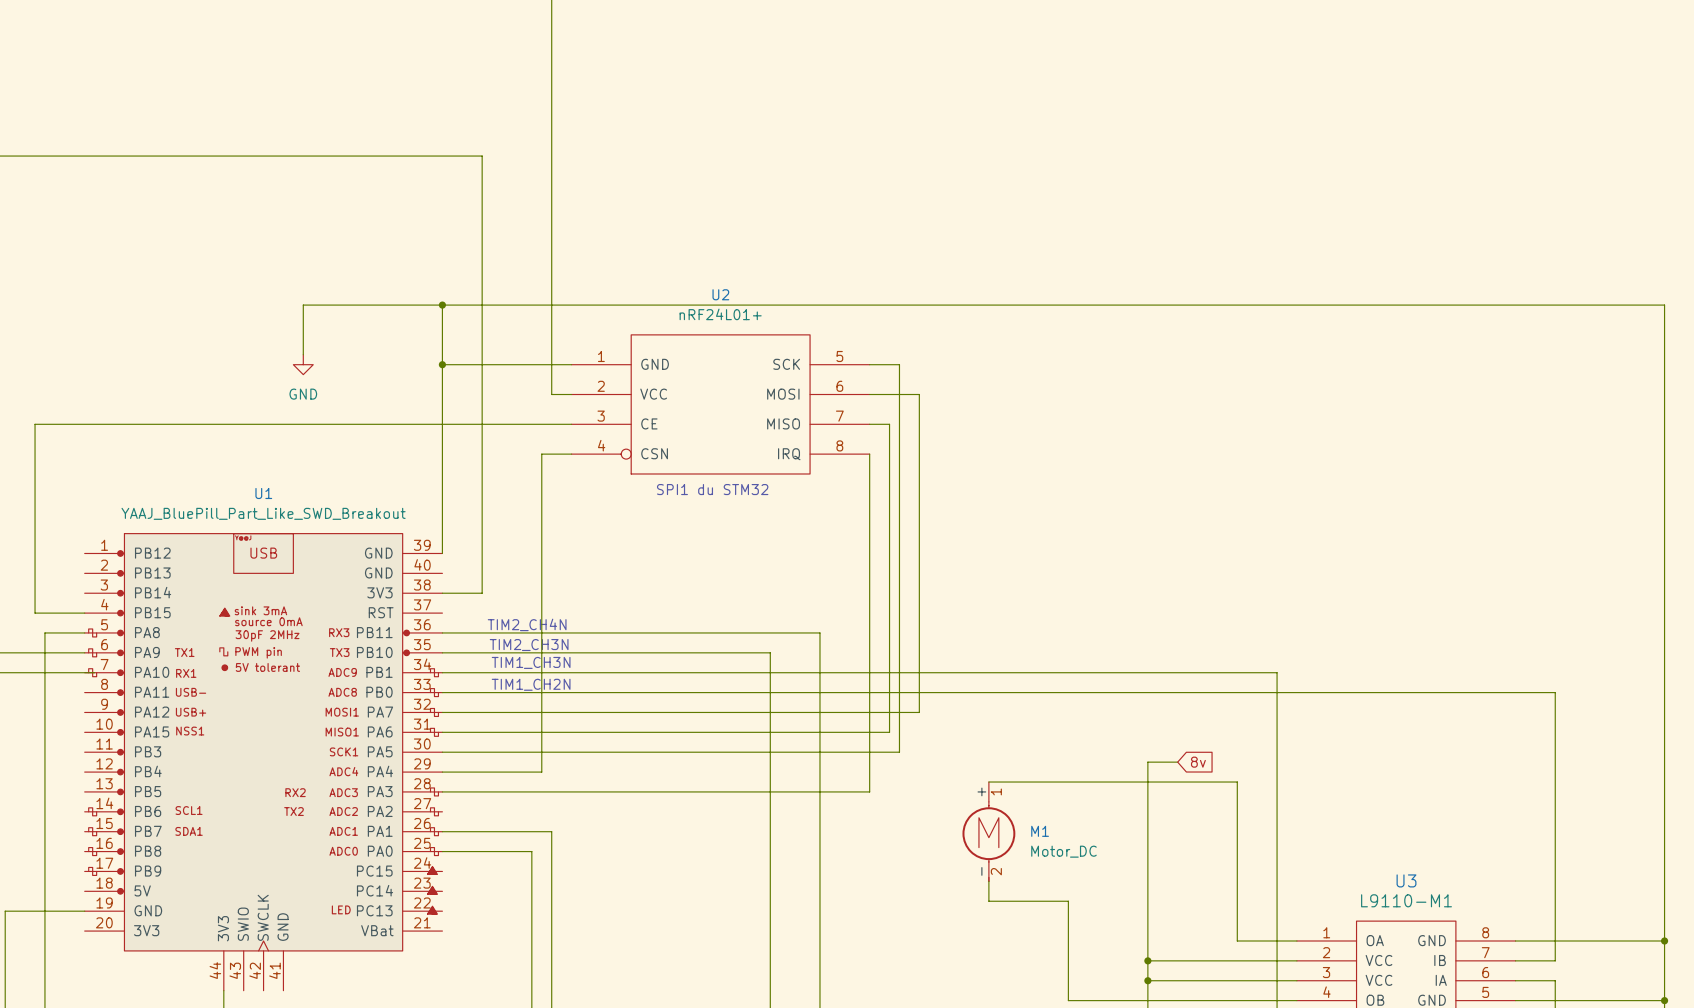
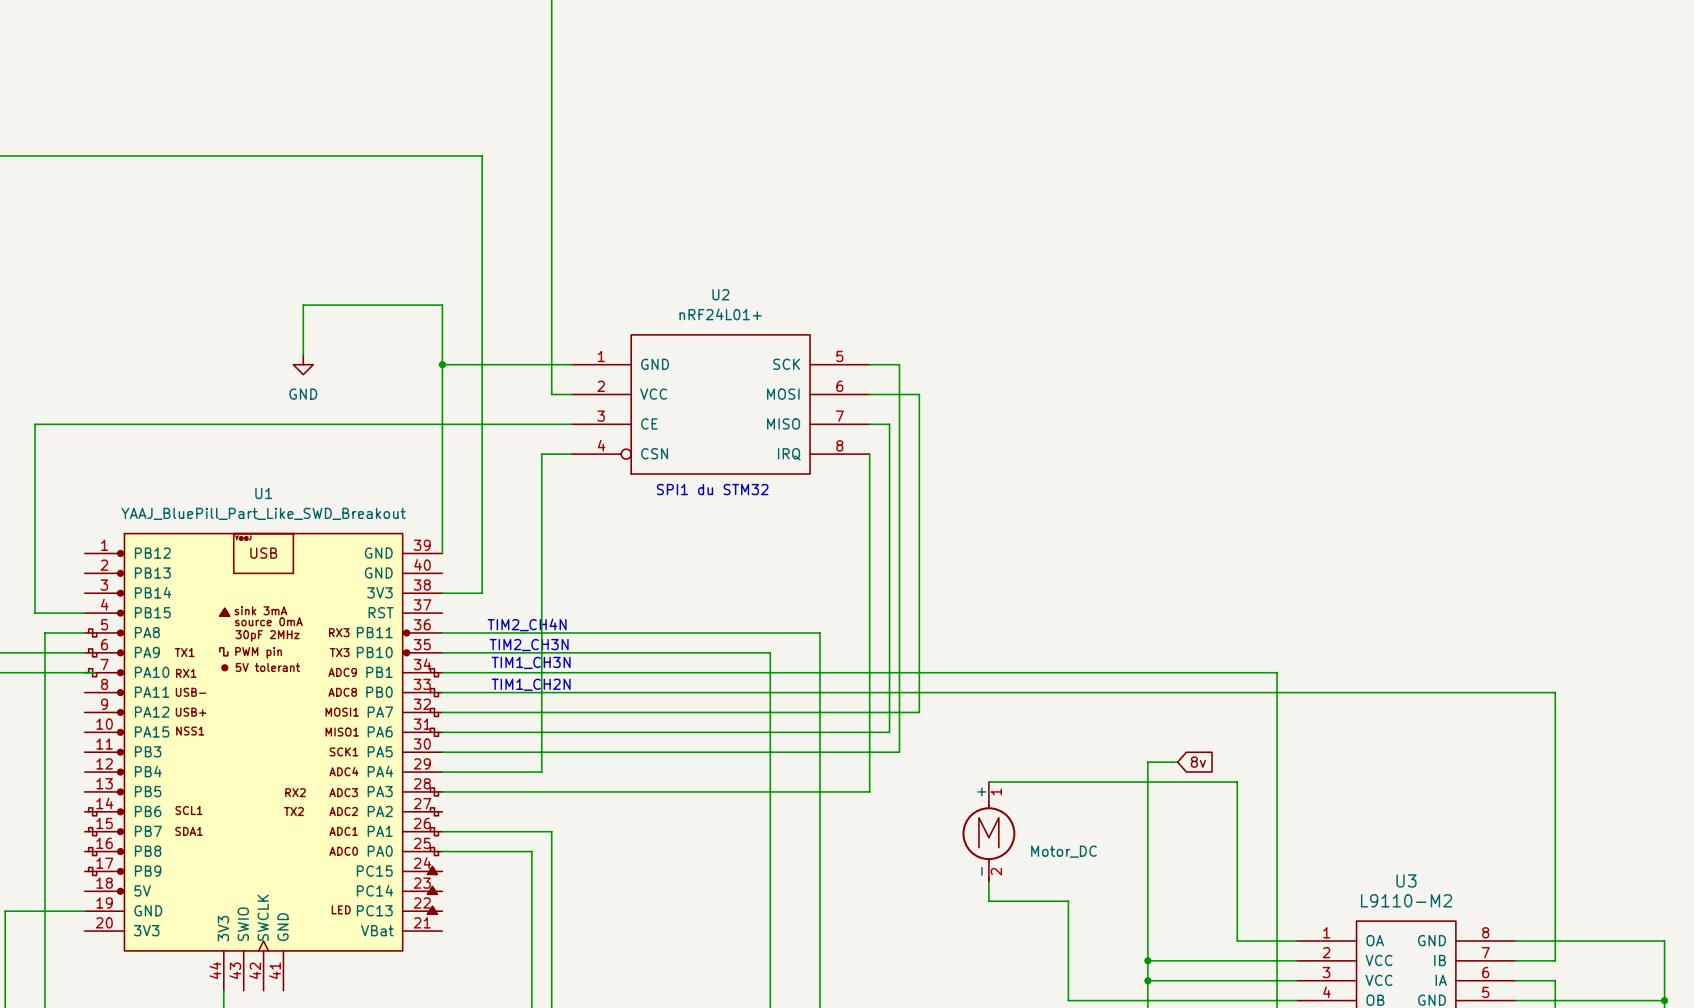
wire: (442, 305) (1664, 305) (1664, 940) -> none
junction: (442, 305) -> none
M1 name: M1 (1040, 831) -> none
U3 value: L9110-M1 (1406, 900) -> L9110-M2 (1406, 900)
junction: (1664, 940) -> none

